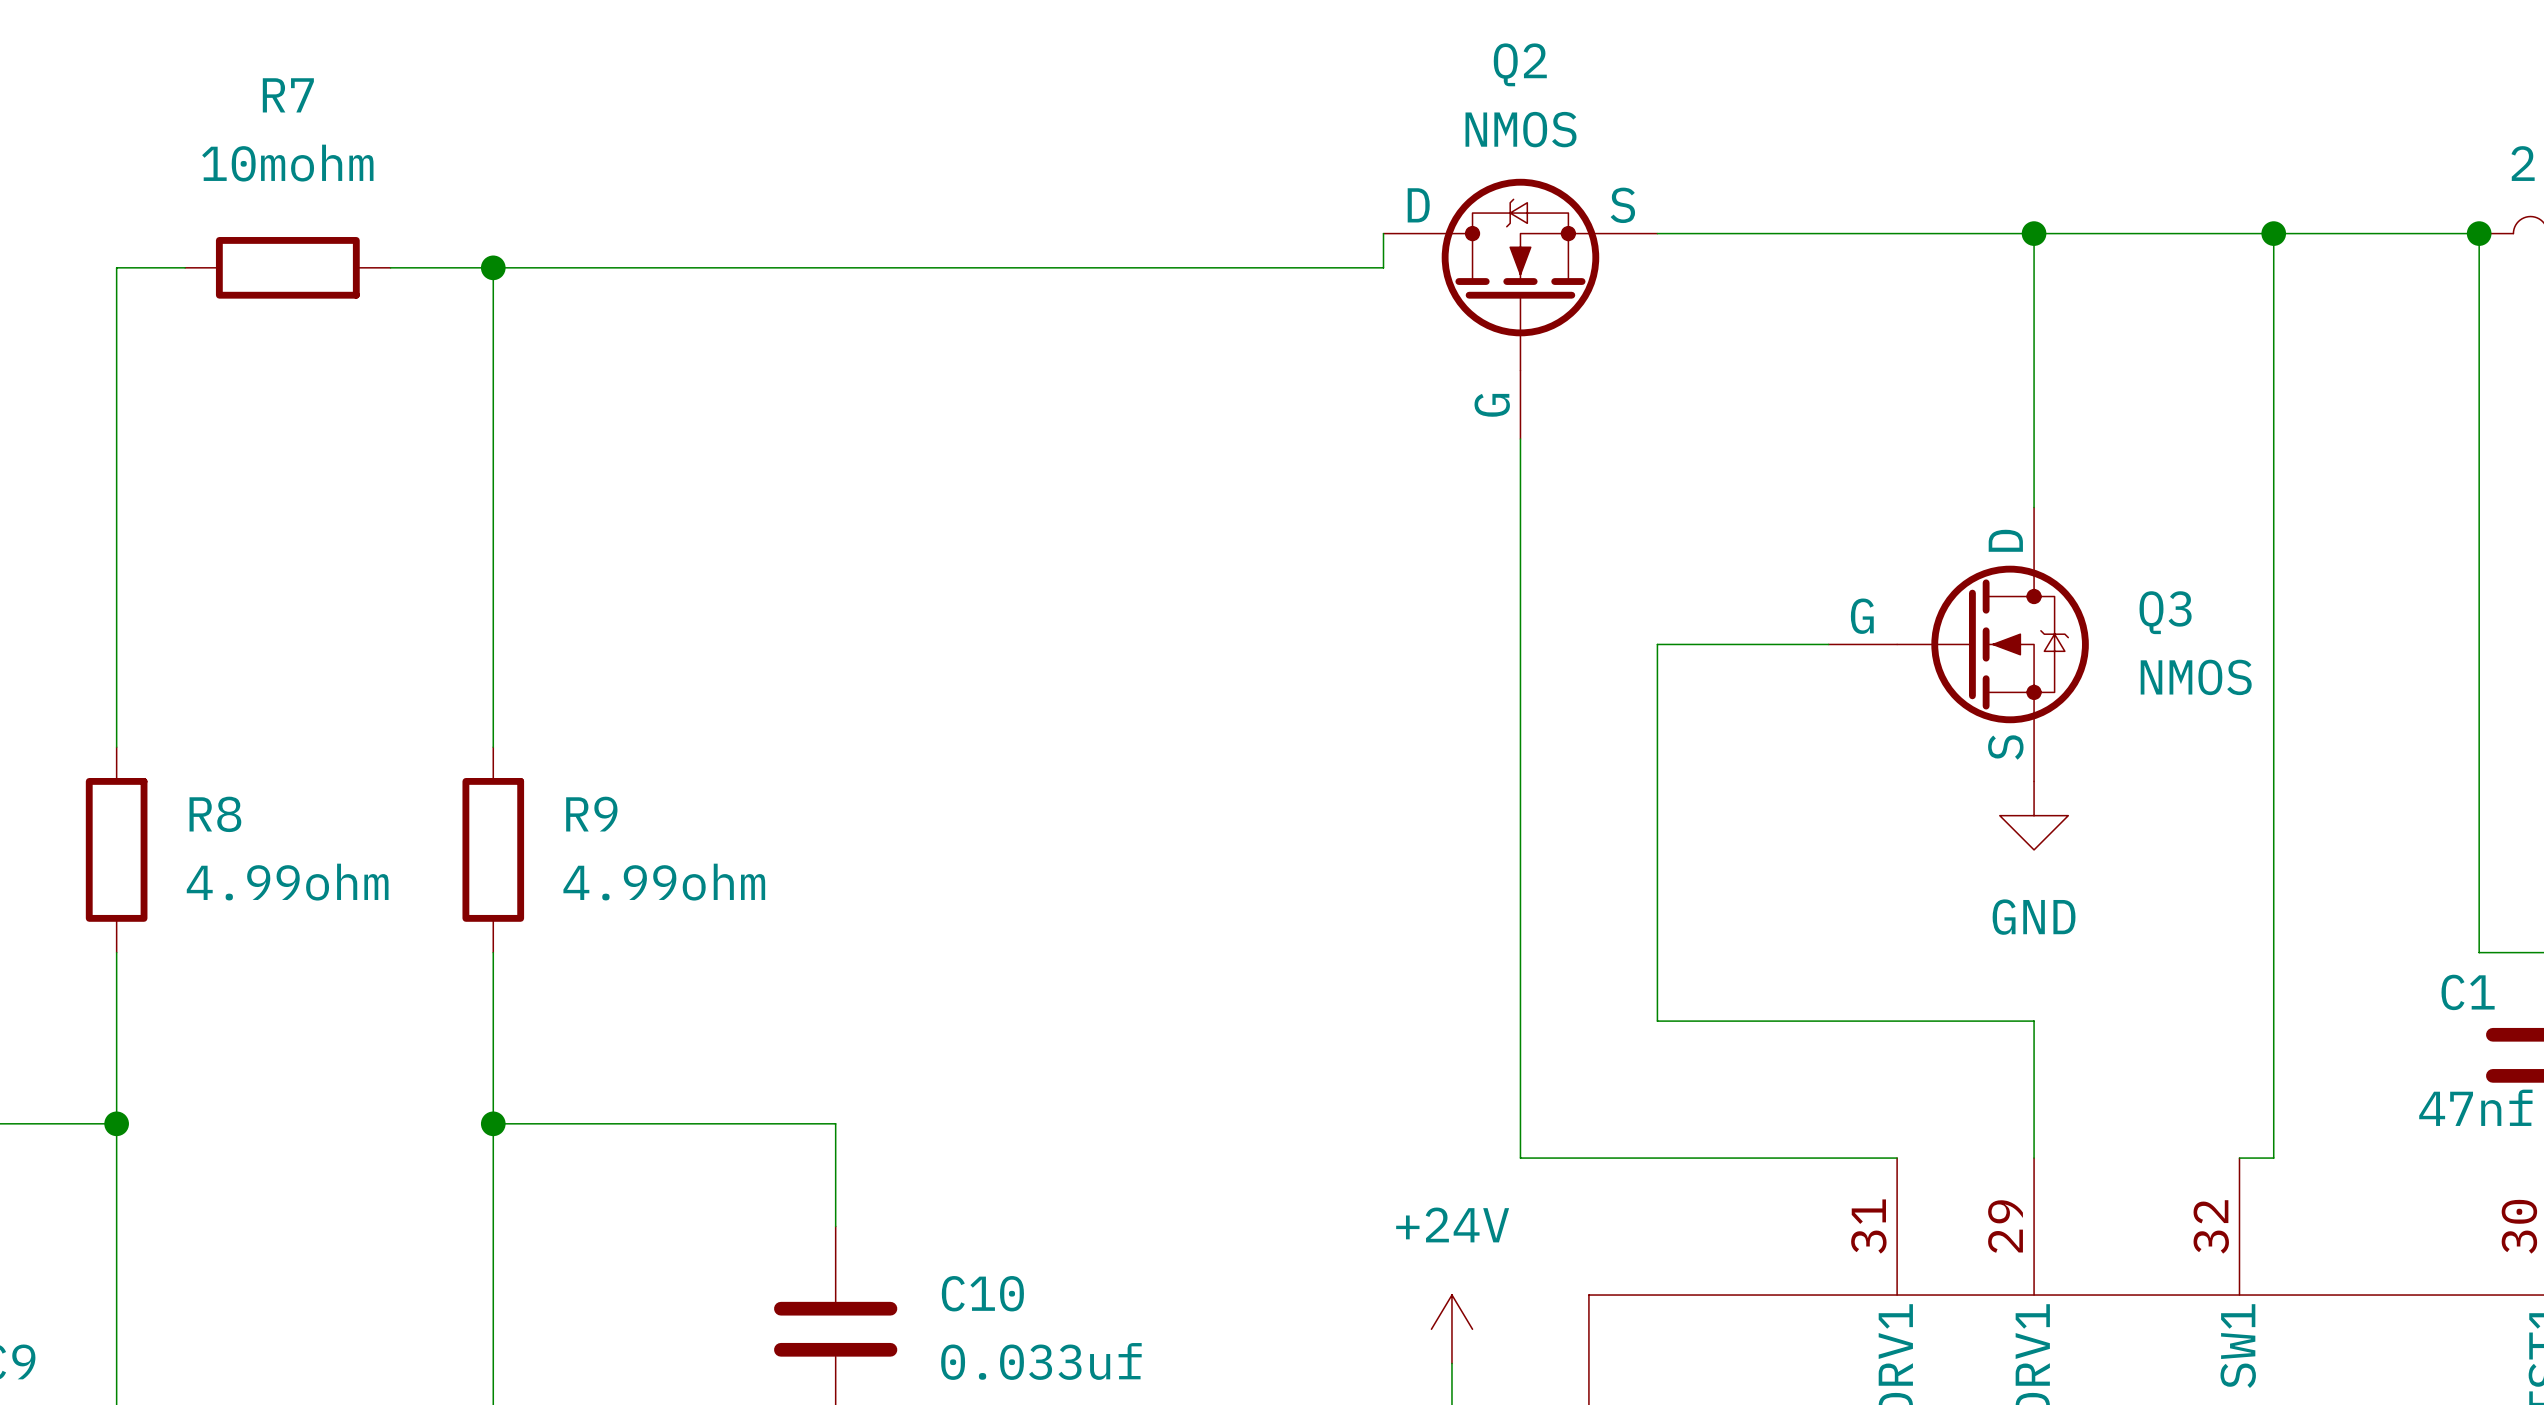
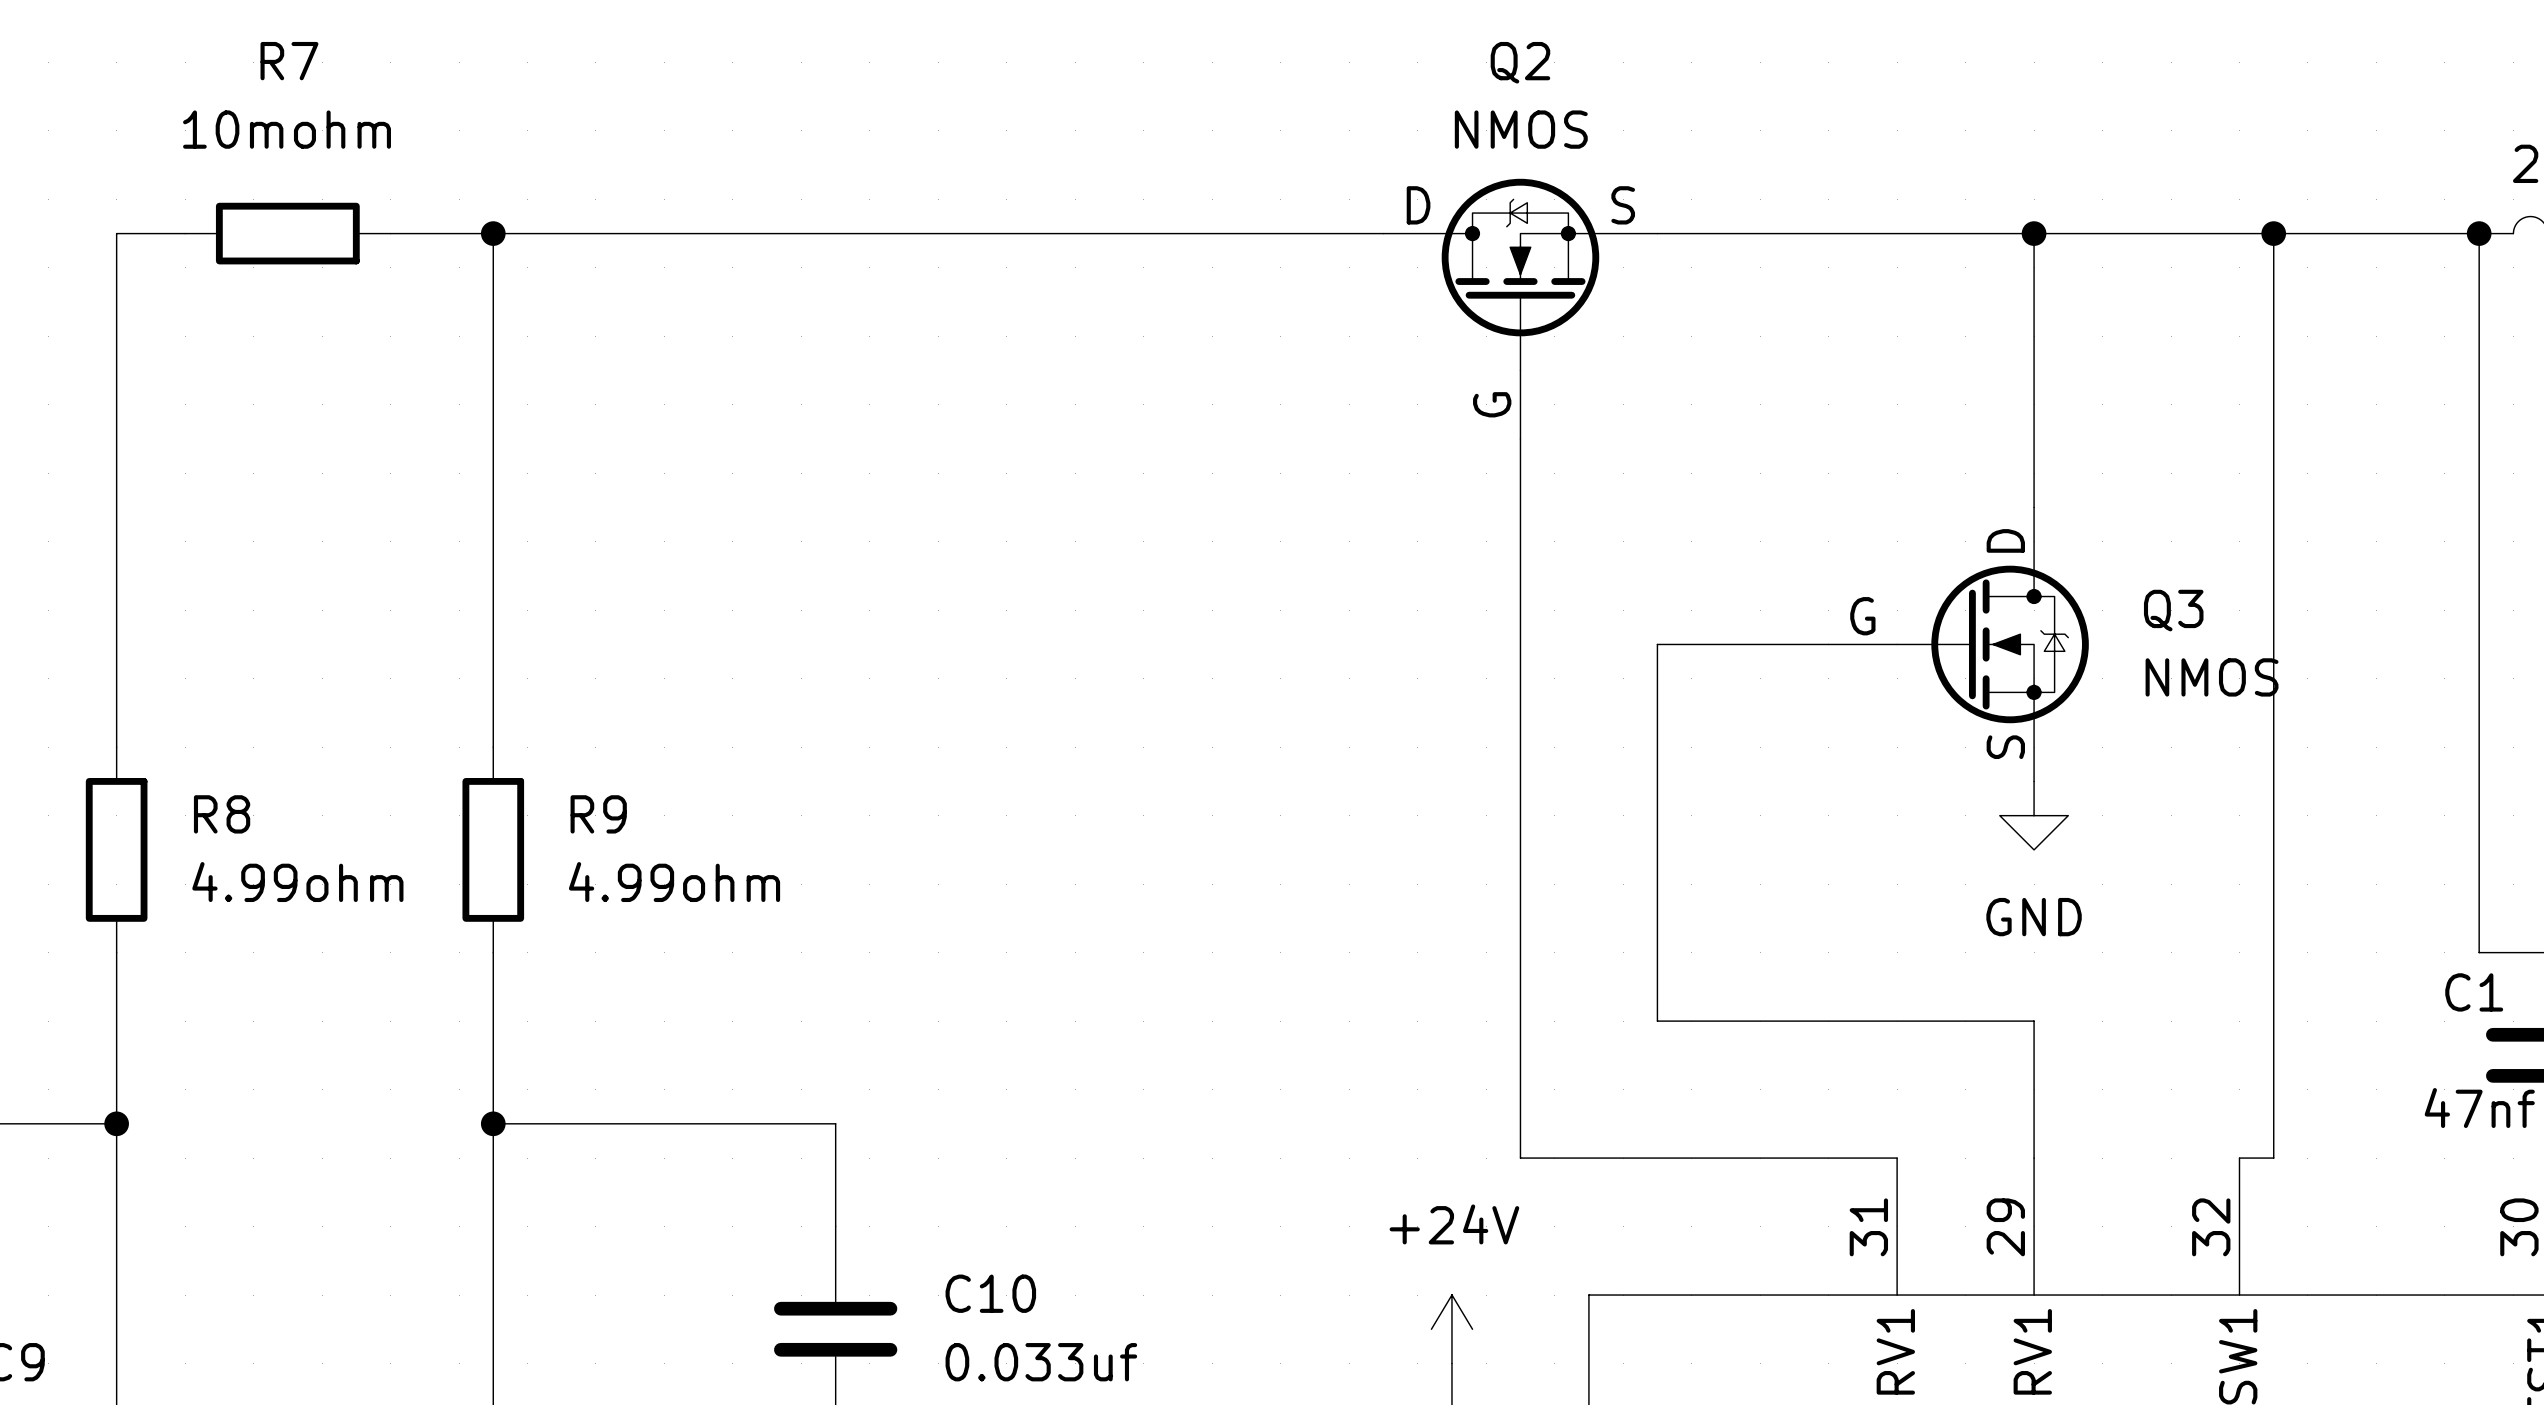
wire: none -> (493, 233) (493, 267)
wire: (1383, 233) (1383, 267) (390, 267) -> (1383, 233) (390, 233)
wire: (116, 267) (185, 267) -> (116, 267) (116, 233) (185, 233)
R7 position: (287, 267) -> (287, 233)
junction position: (493, 267) -> (493, 233)

